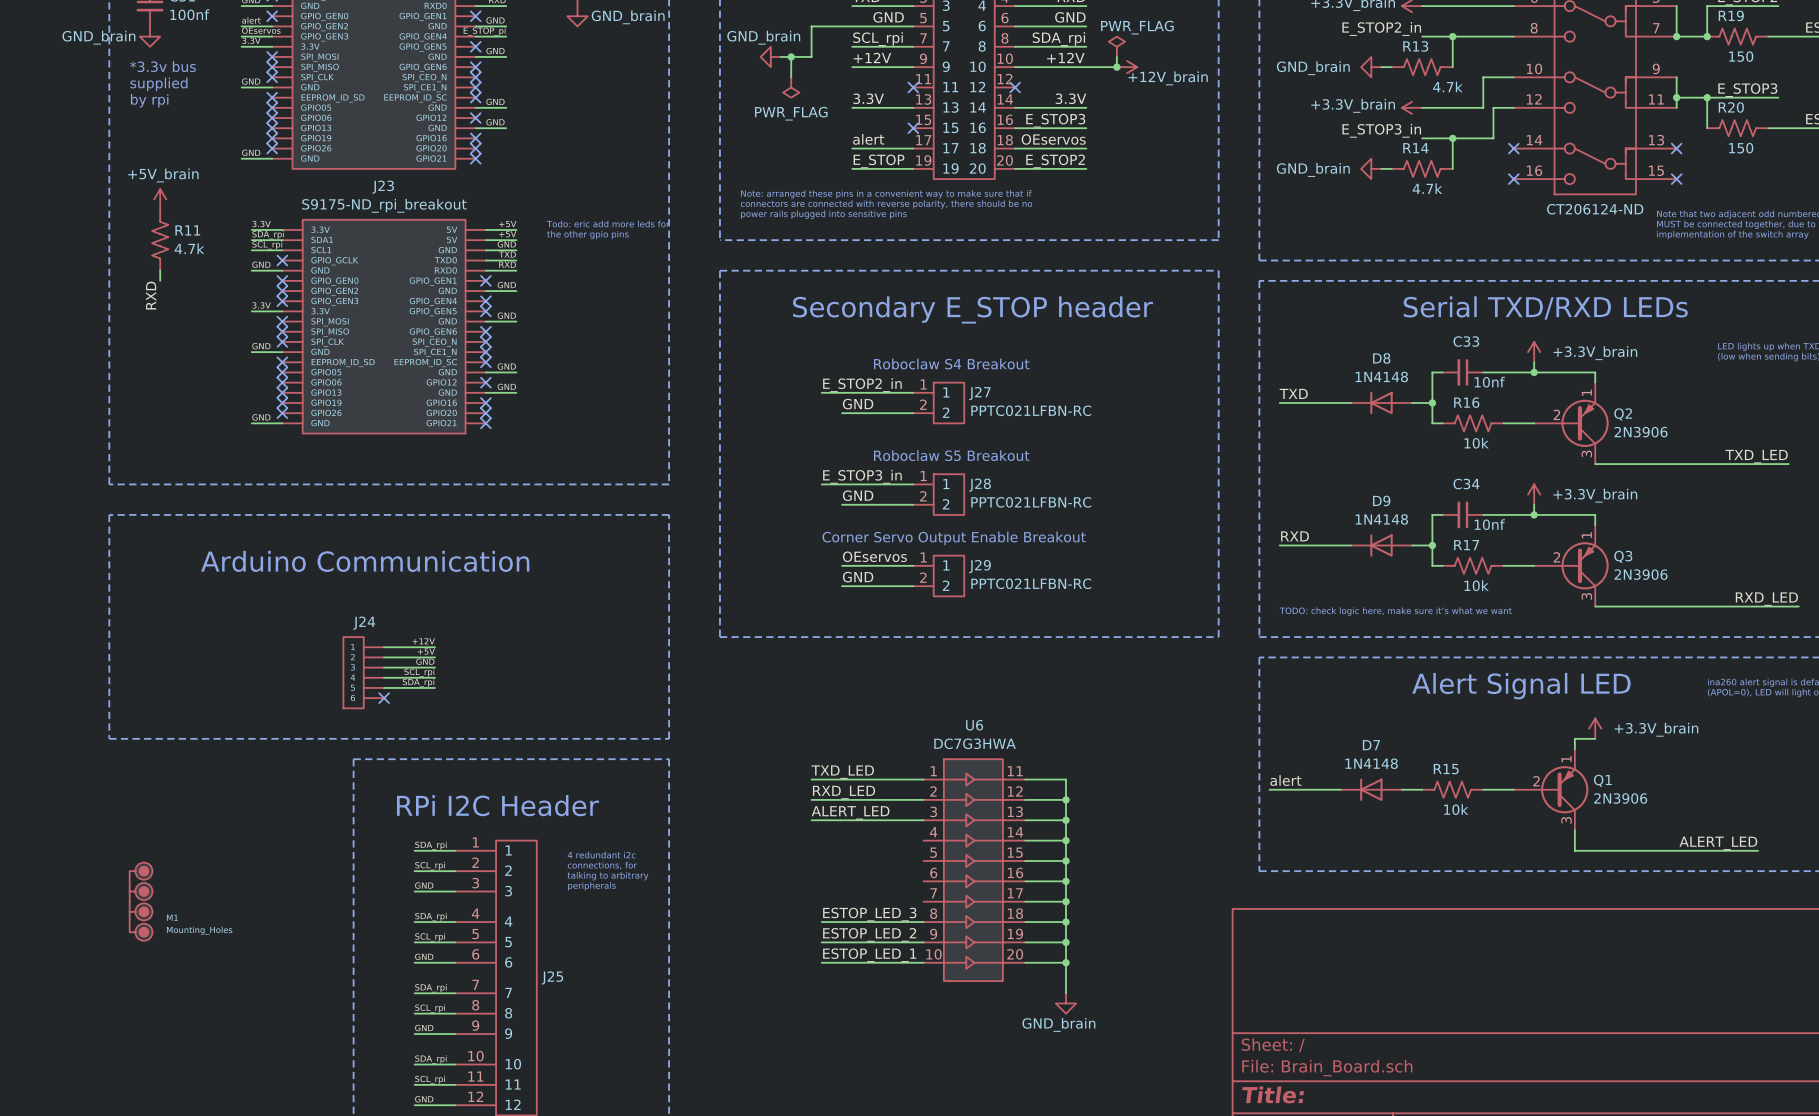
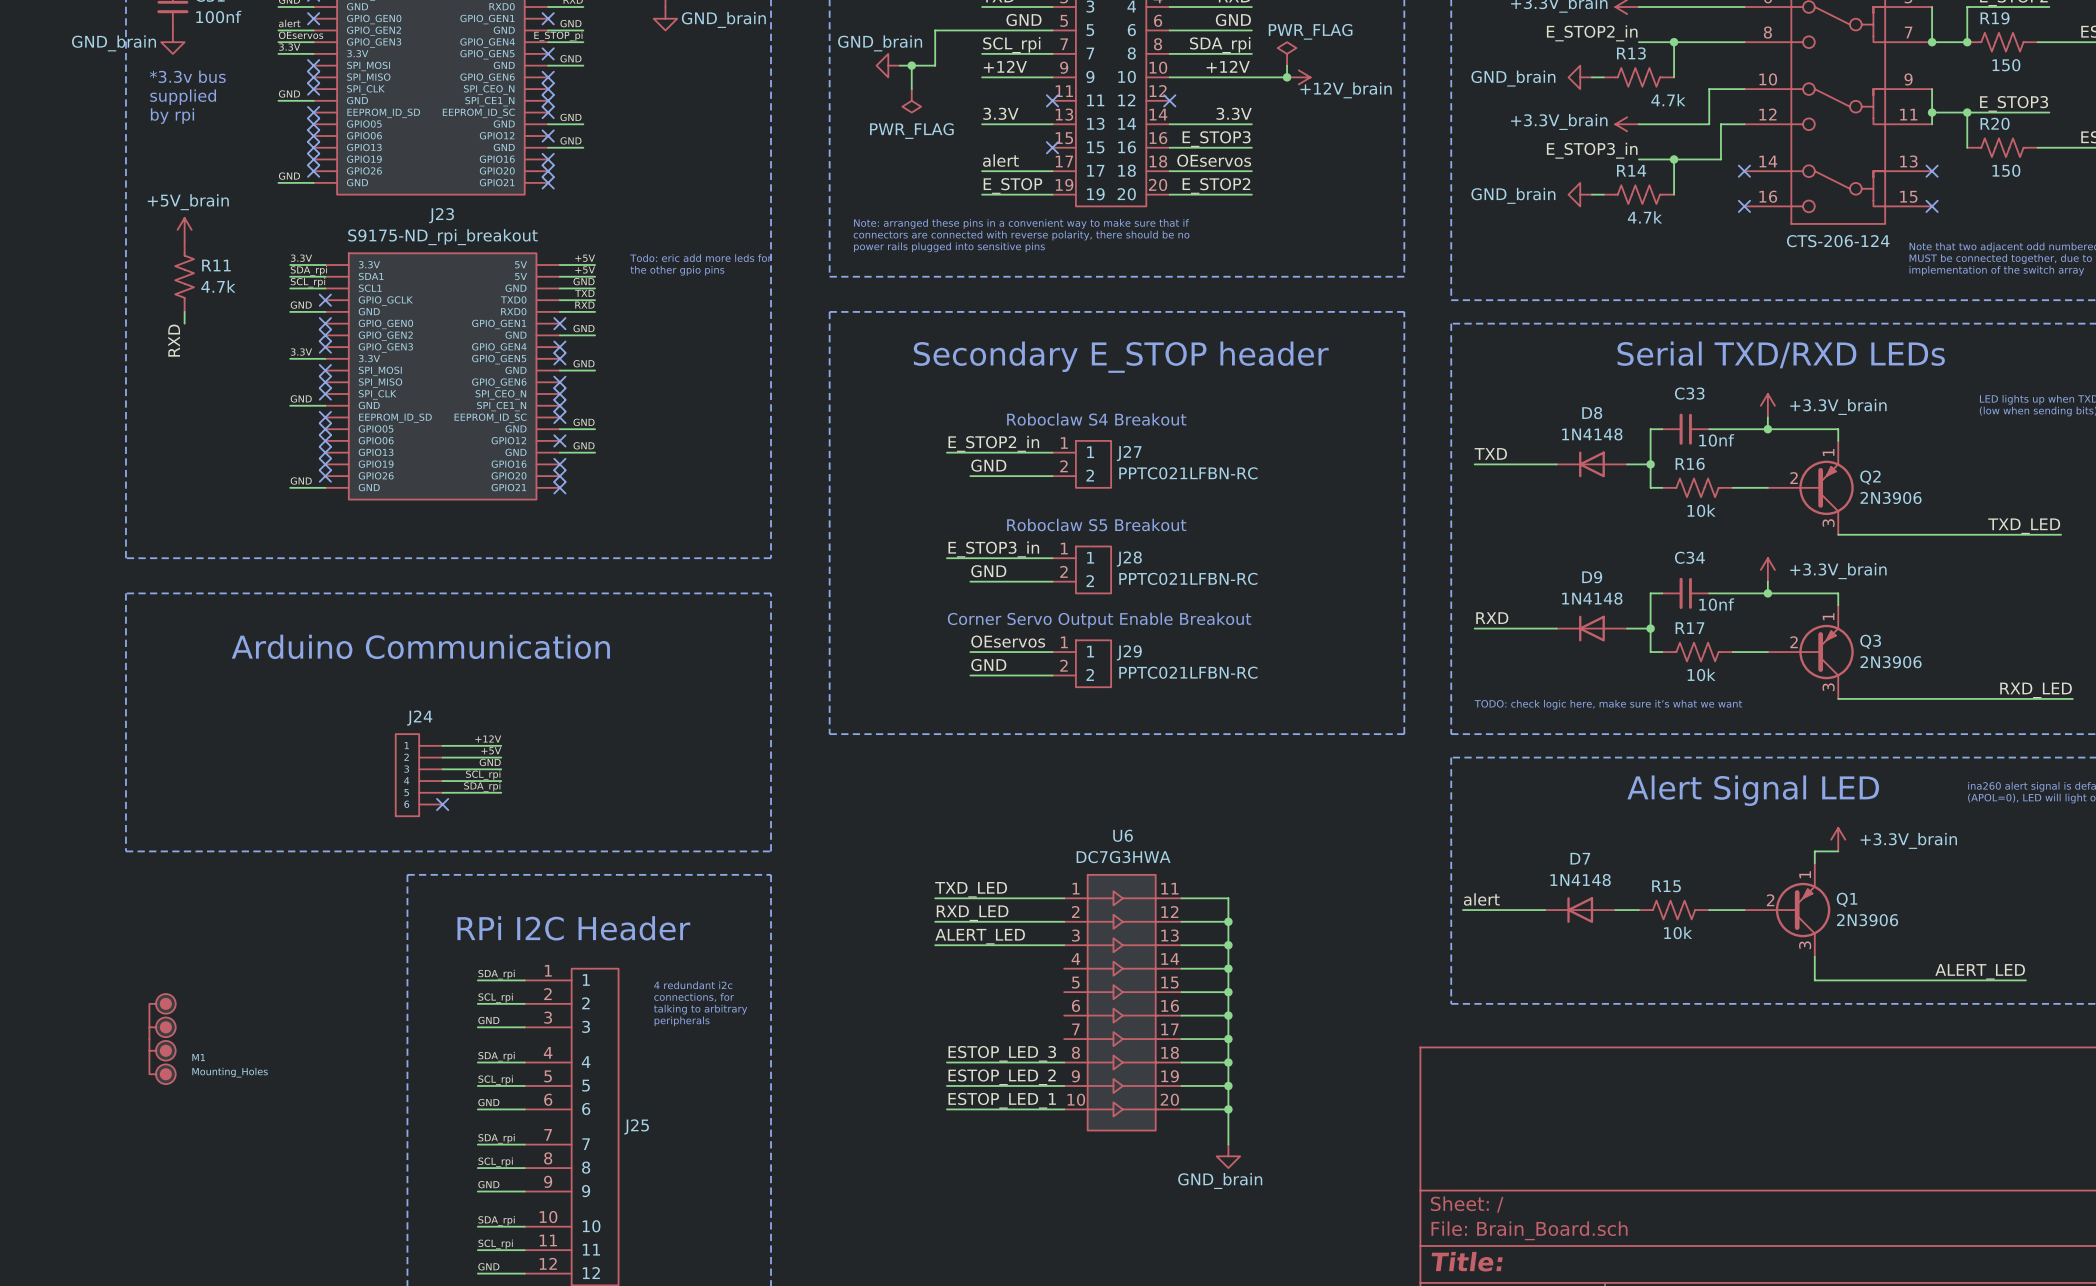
part value: CT206124-ND (1595, 209) -> CTS-206-124 (1838, 241)

